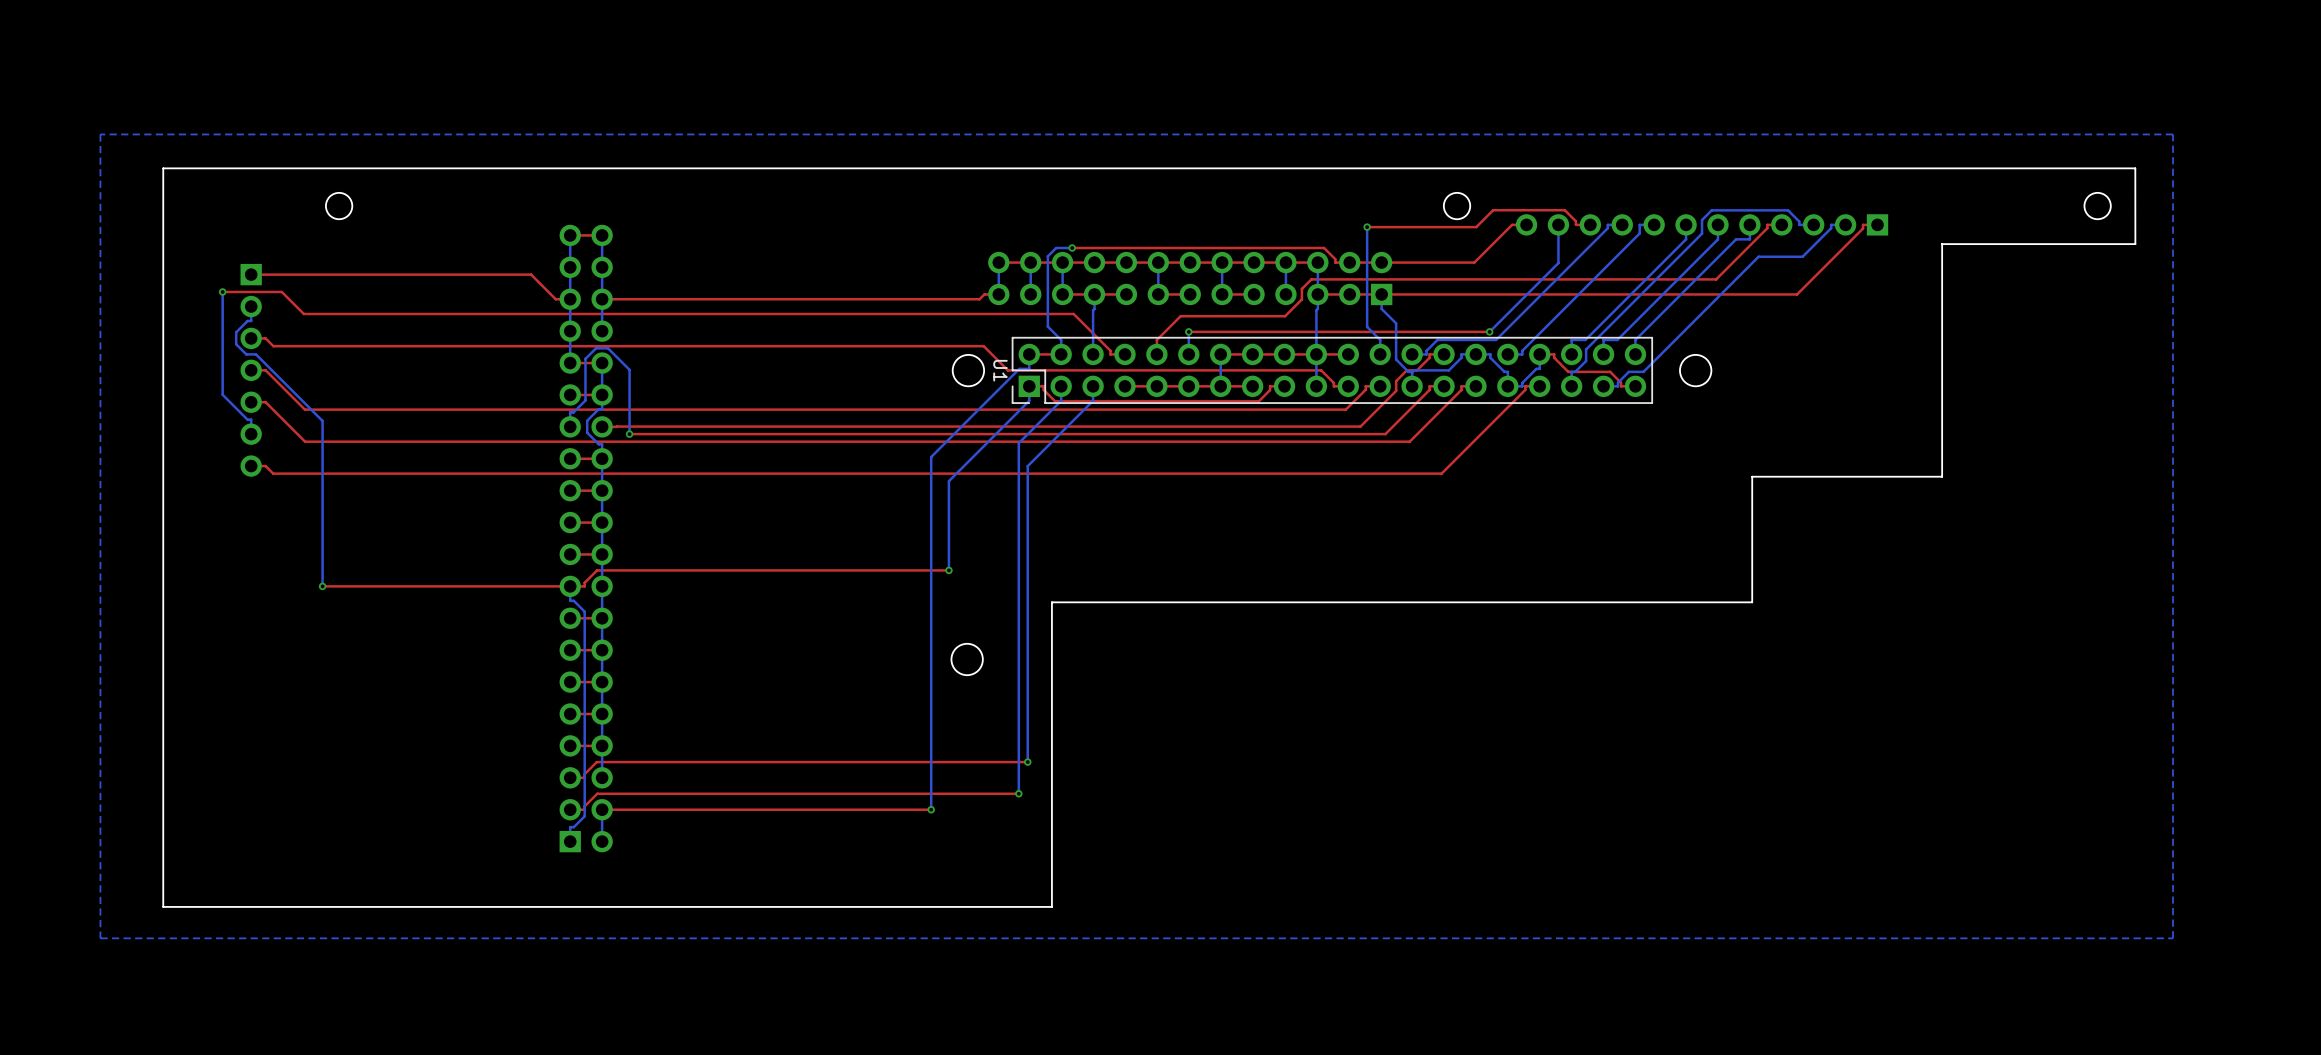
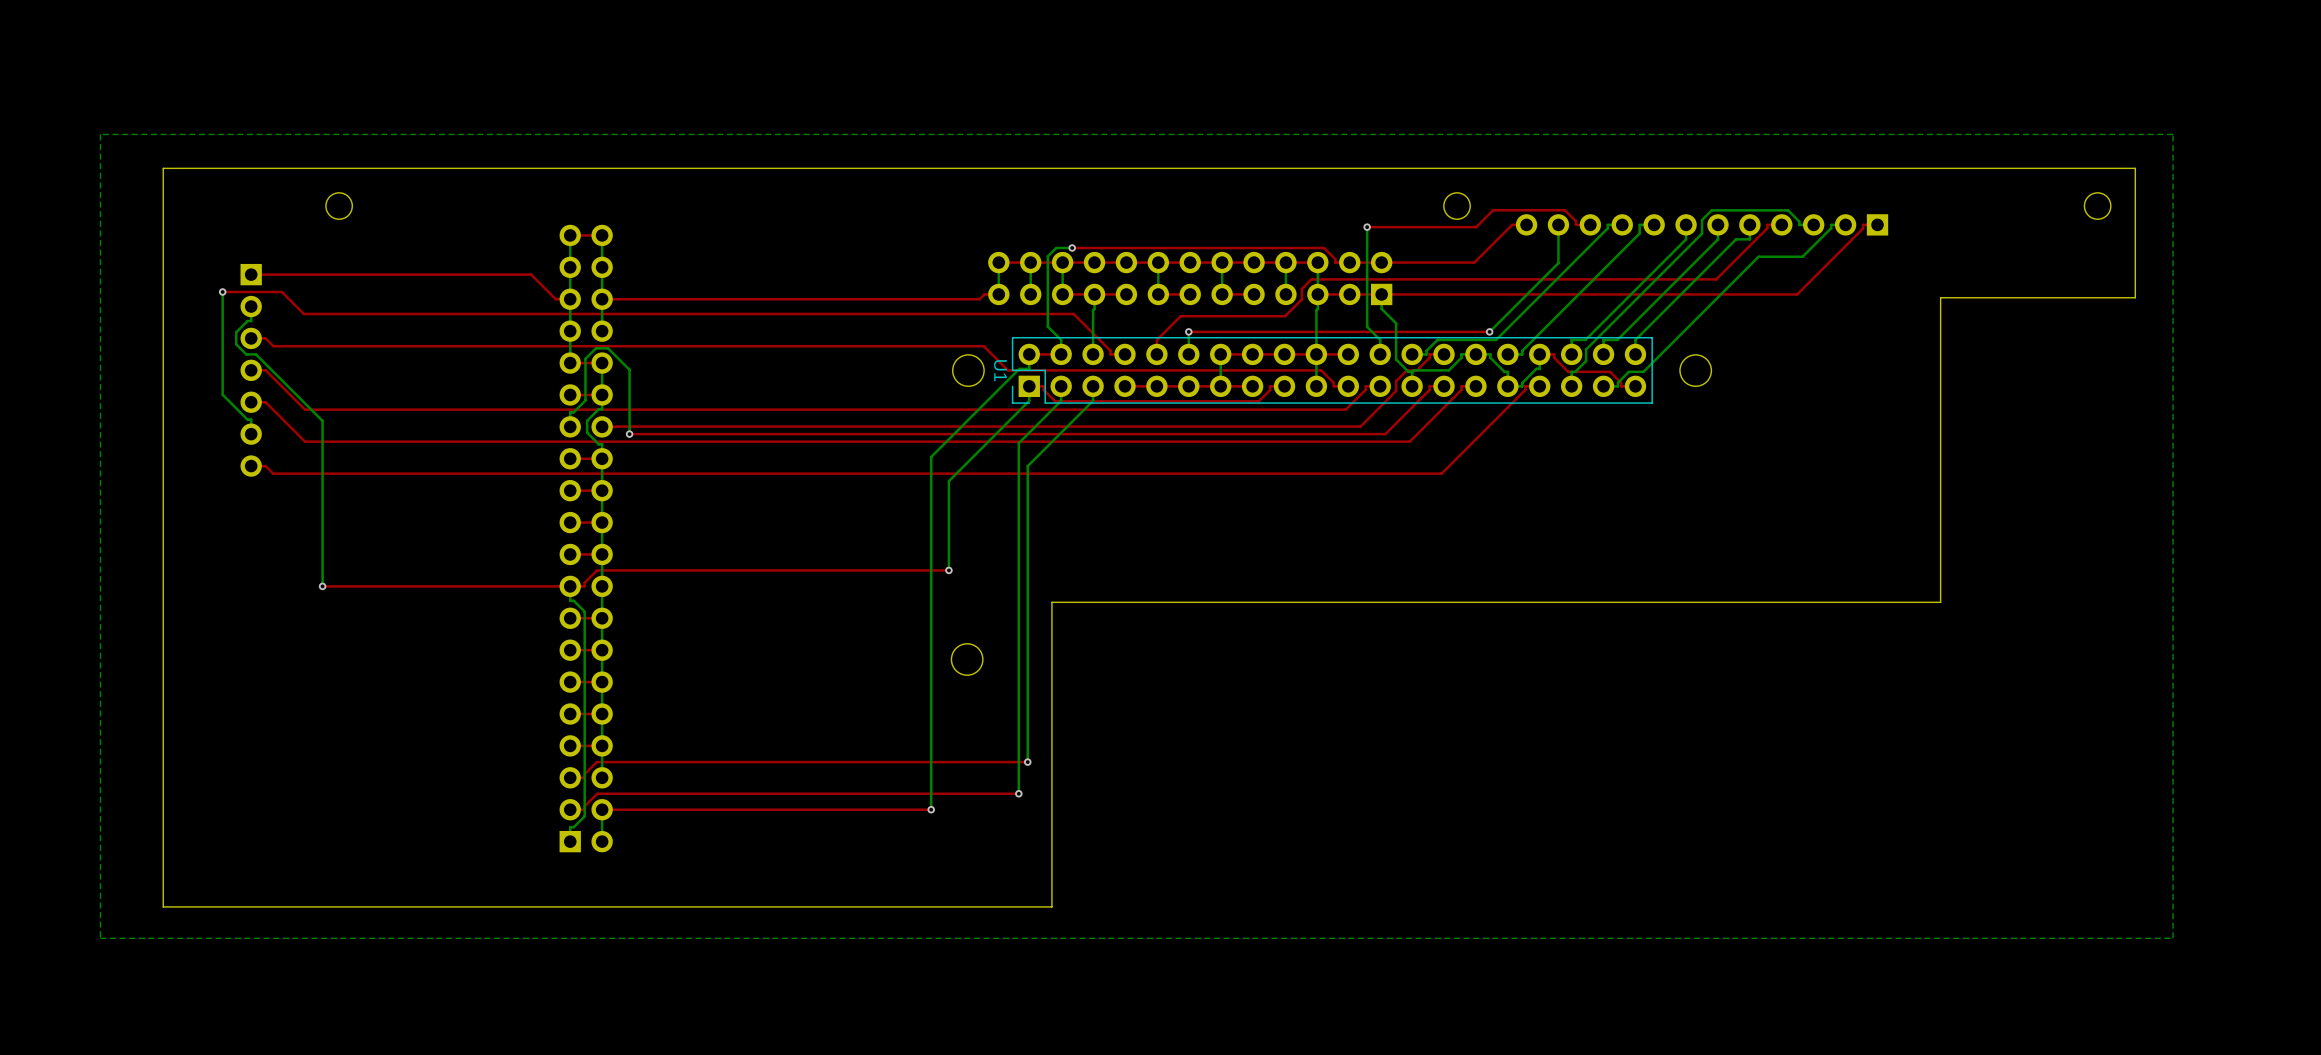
board edge: (2135, 168) (2135, 244) (1941, 244) -> none
board edge: (1942, 244) (1942, 476) (1752, 476) (1752, 602) -> (2135, 168) (2135, 297) (1940, 297) (1940, 602) (1752, 602)

